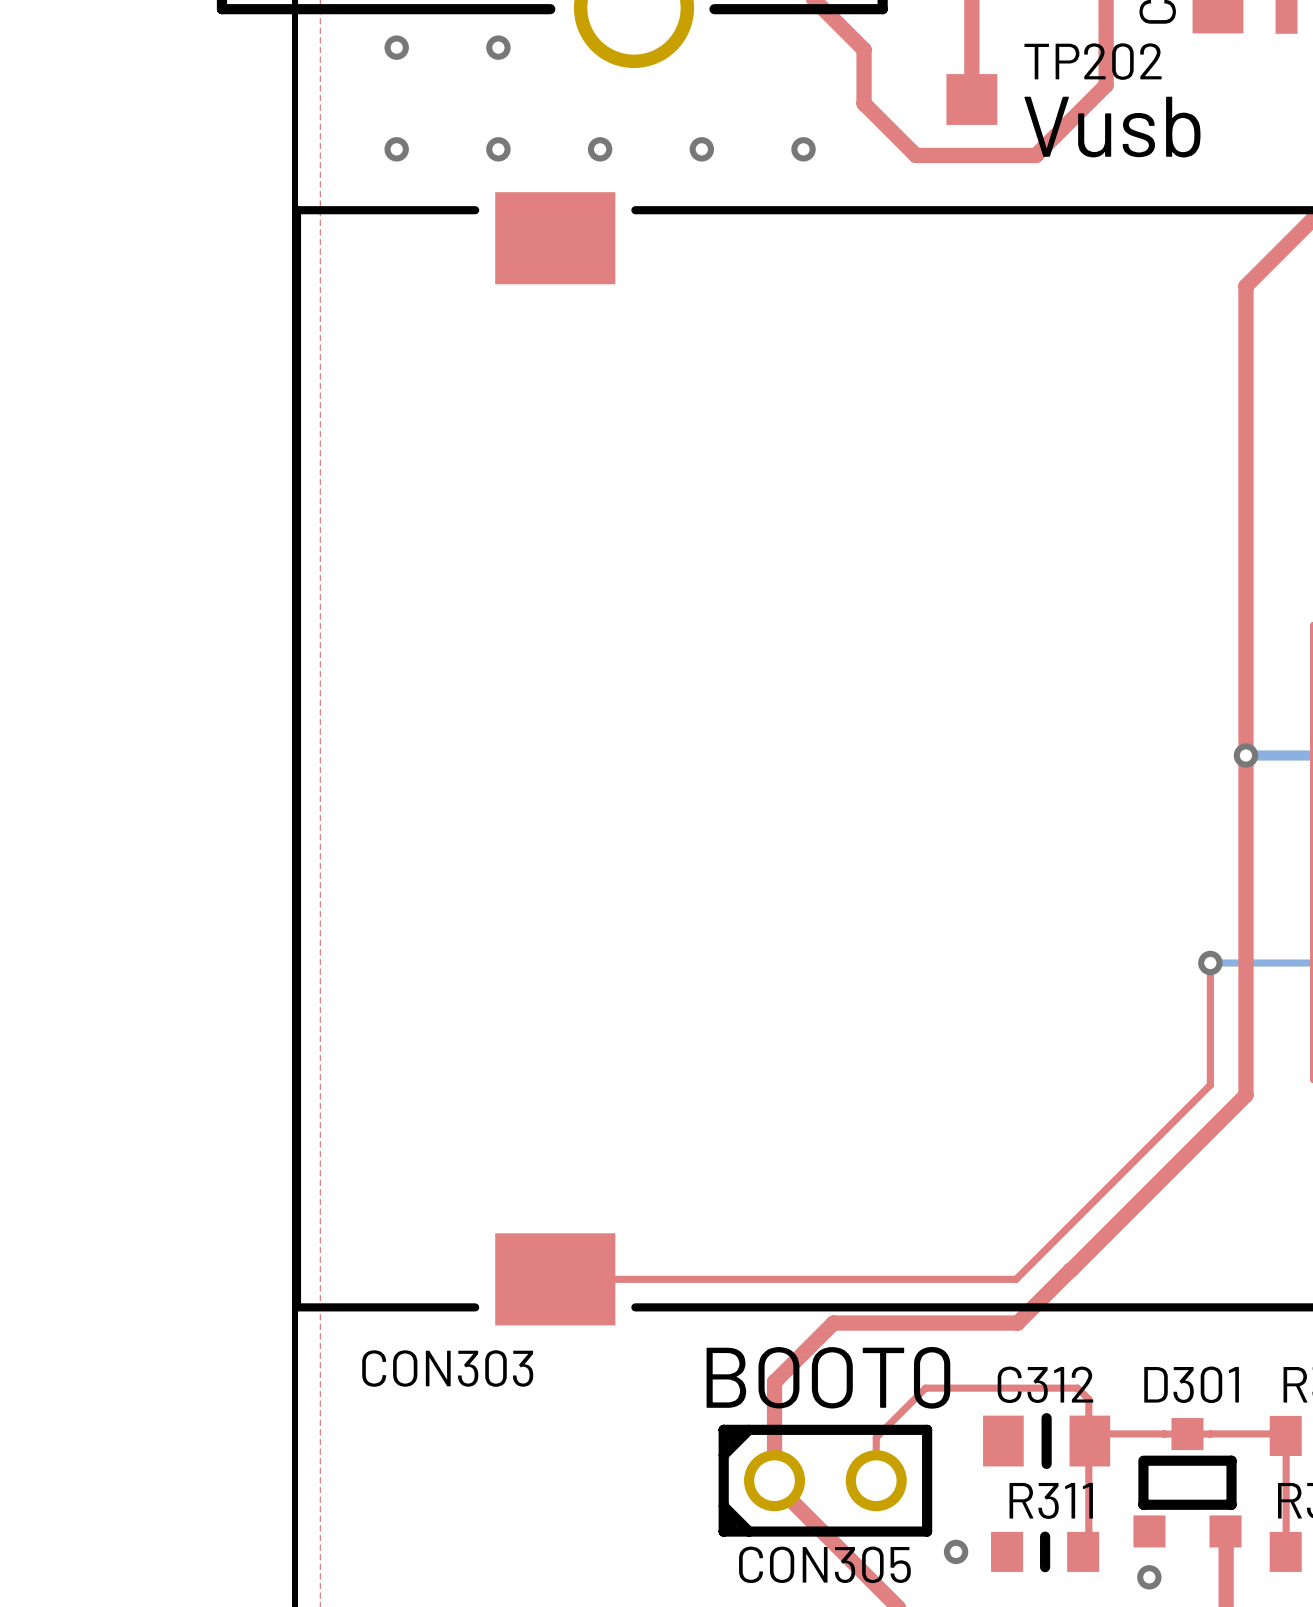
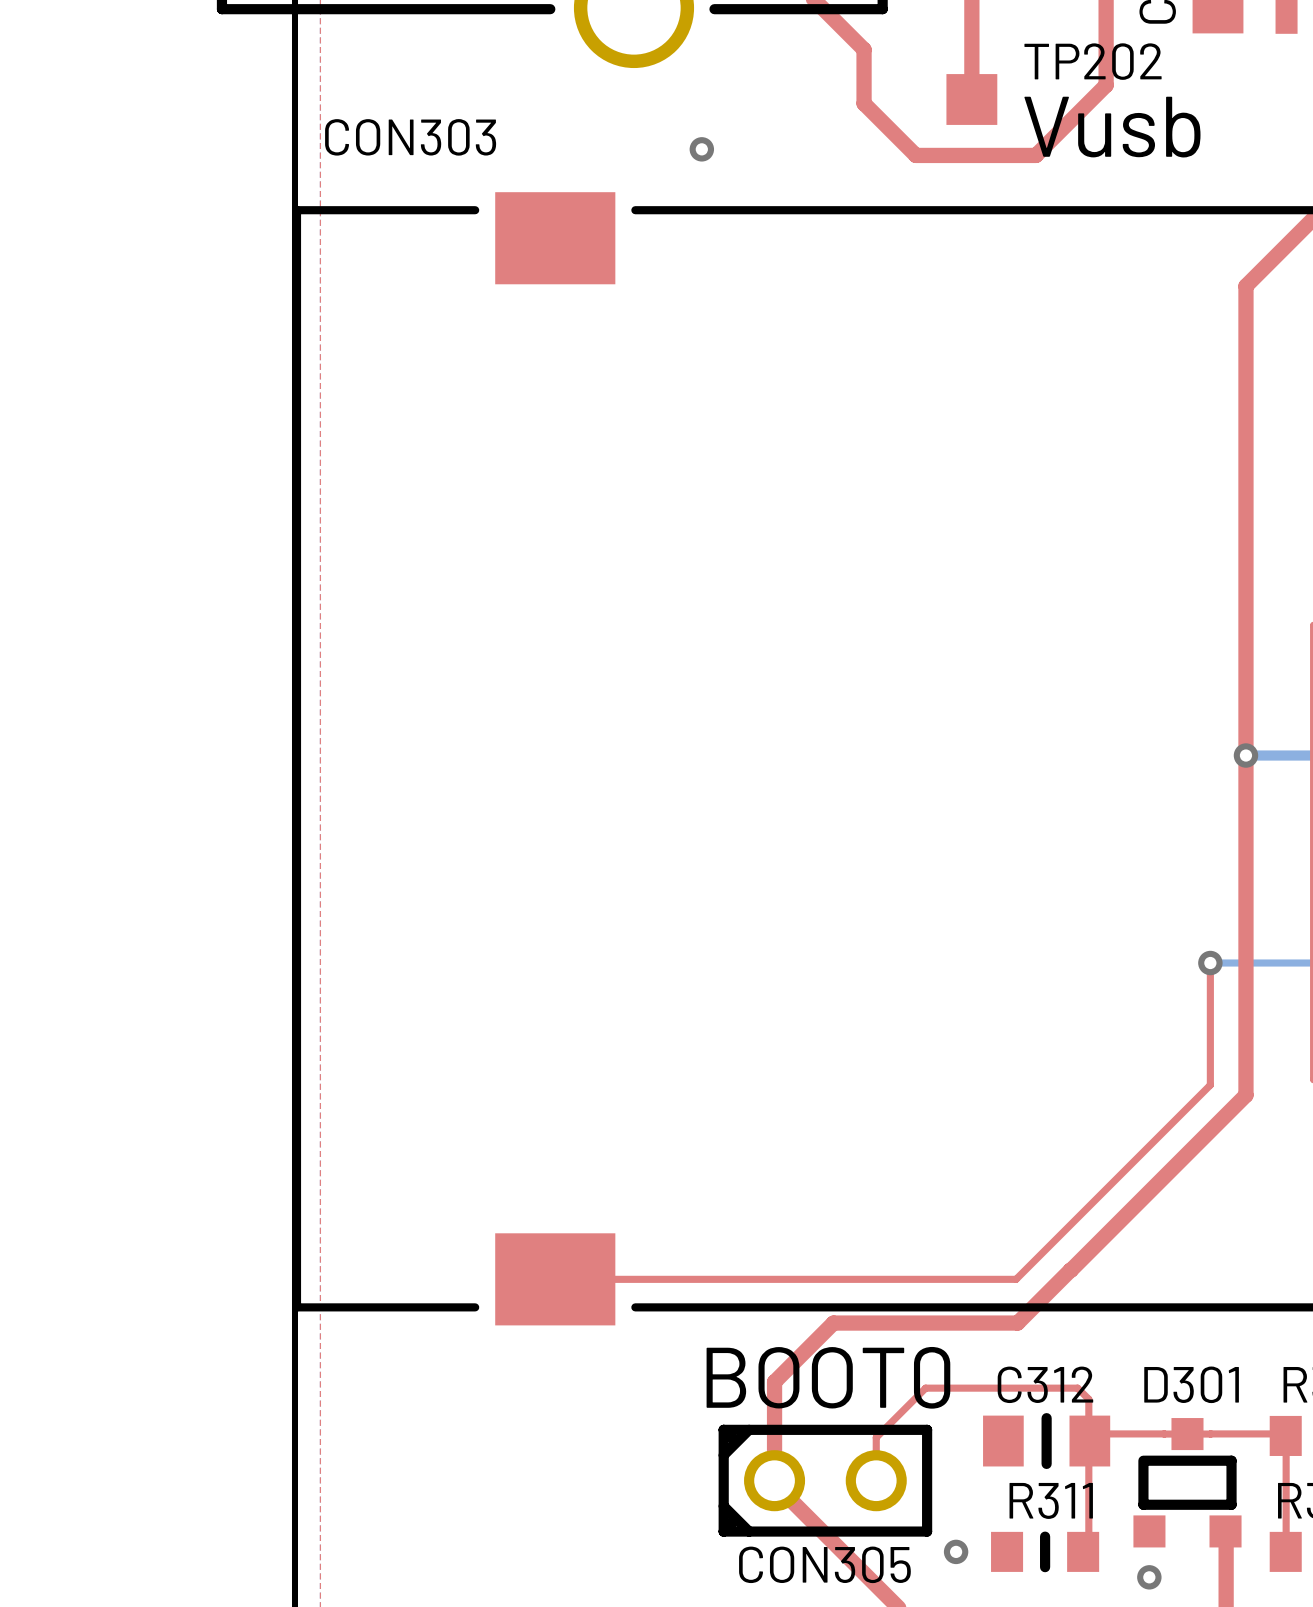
via: (396, 47) -> none
via: (498, 47) -> none
via: (396, 149) -> none
via: (498, 149) -> none
via: (600, 149) -> none
via: (803, 149) -> none
CON303 name position: CON303 (447, 1368) -> CON303 (410, 137)

